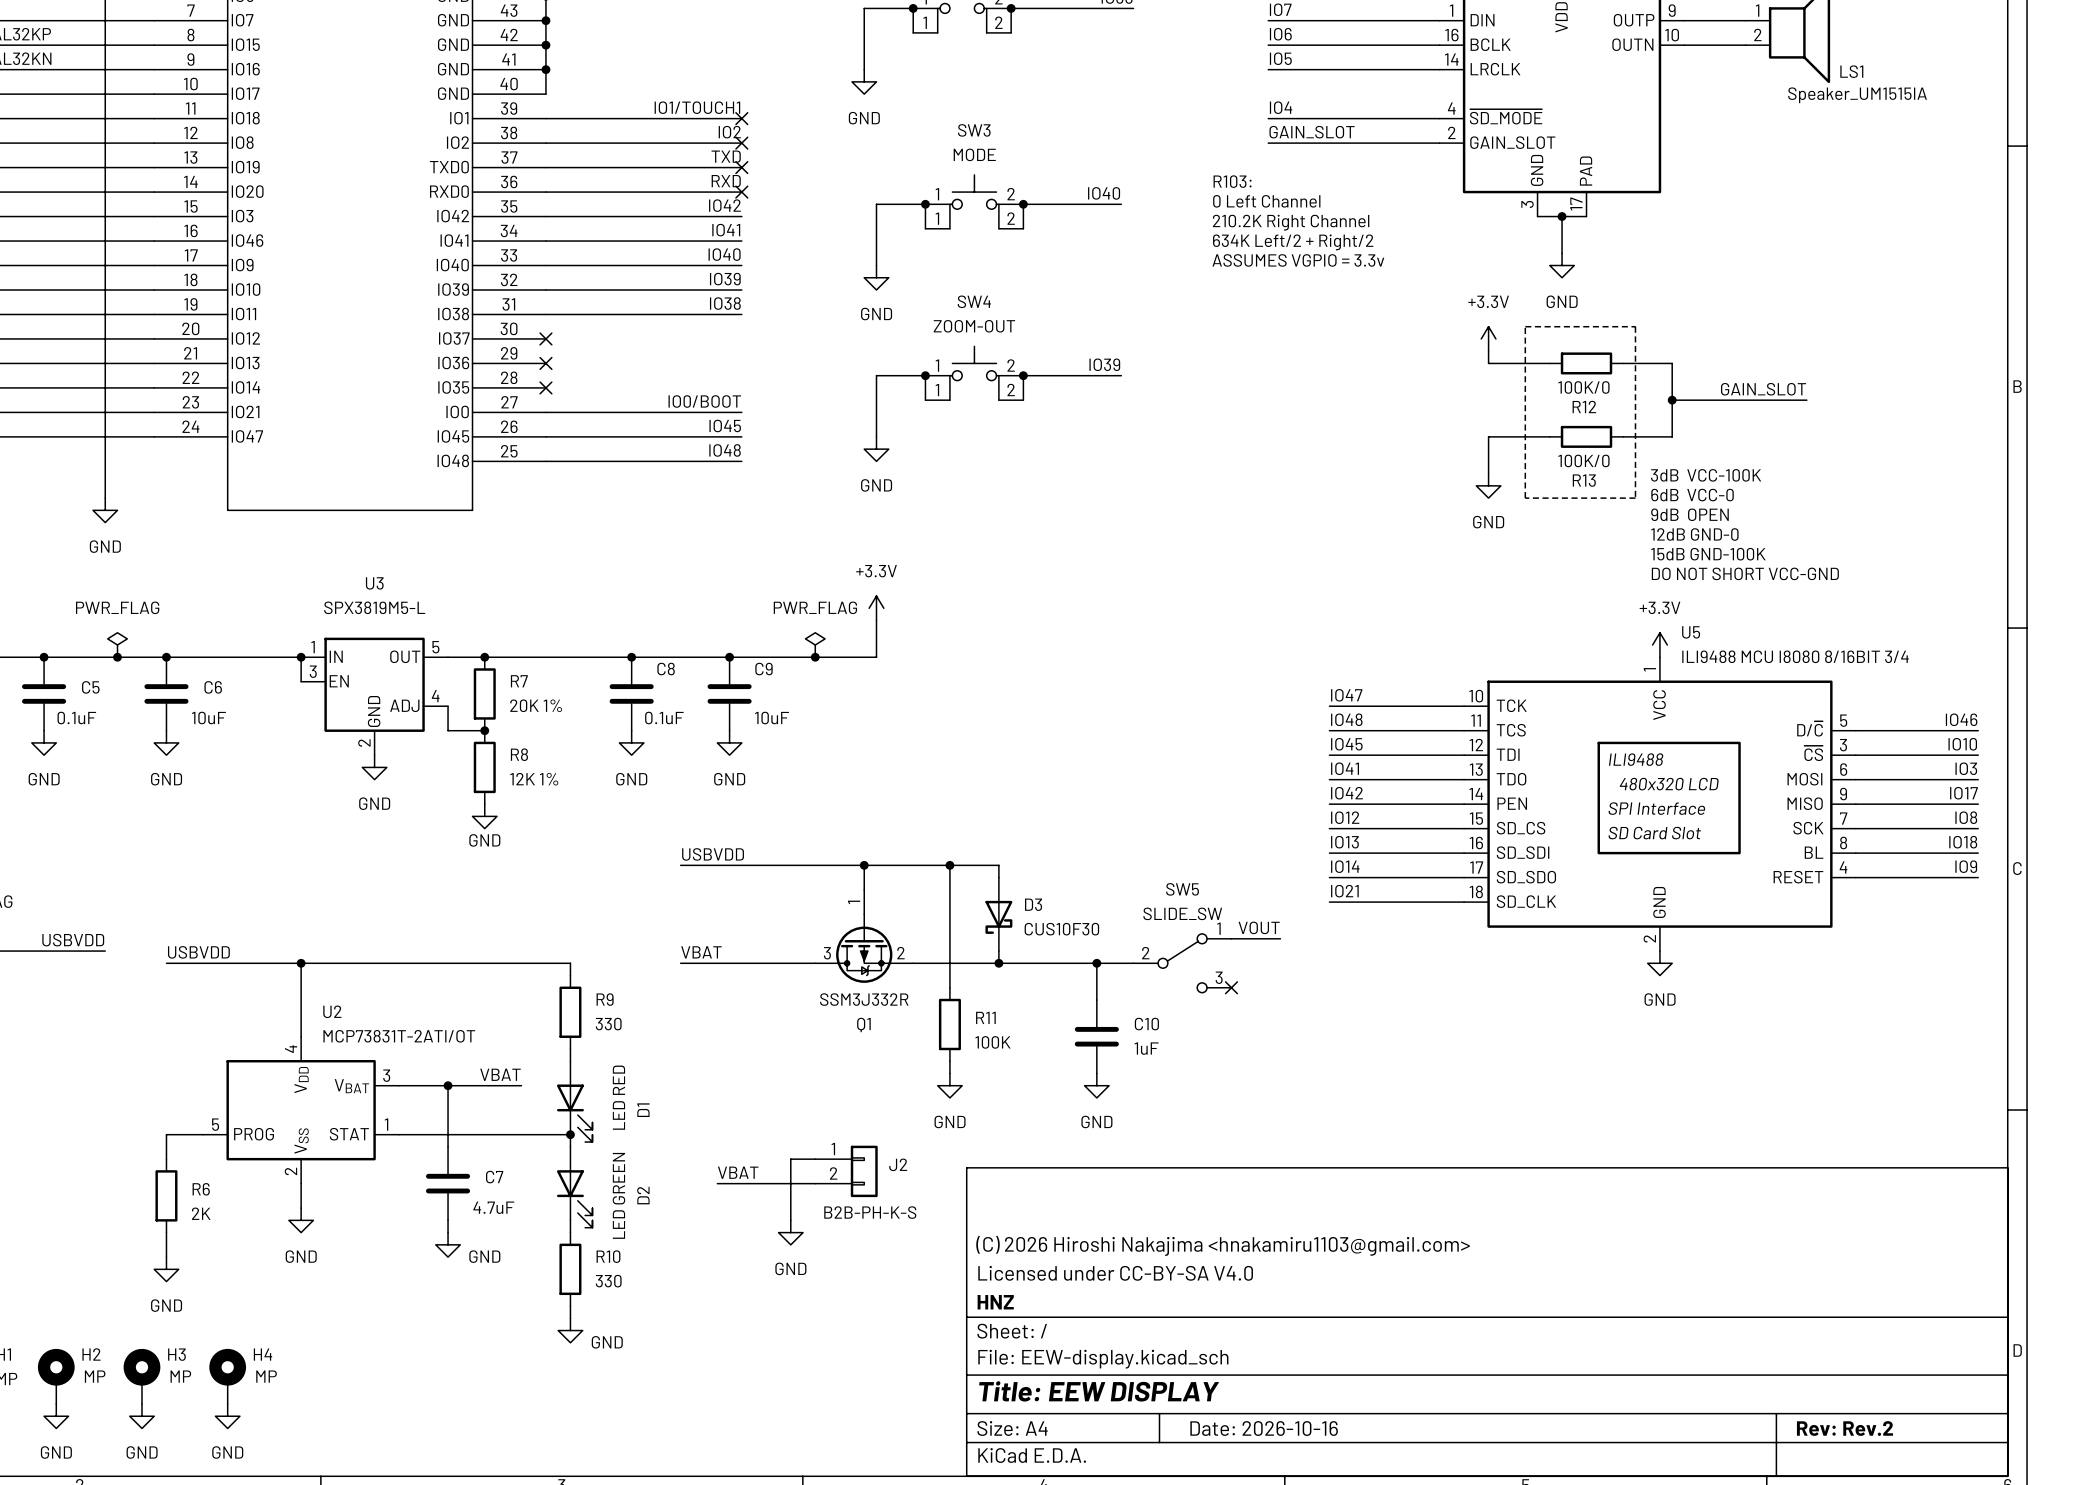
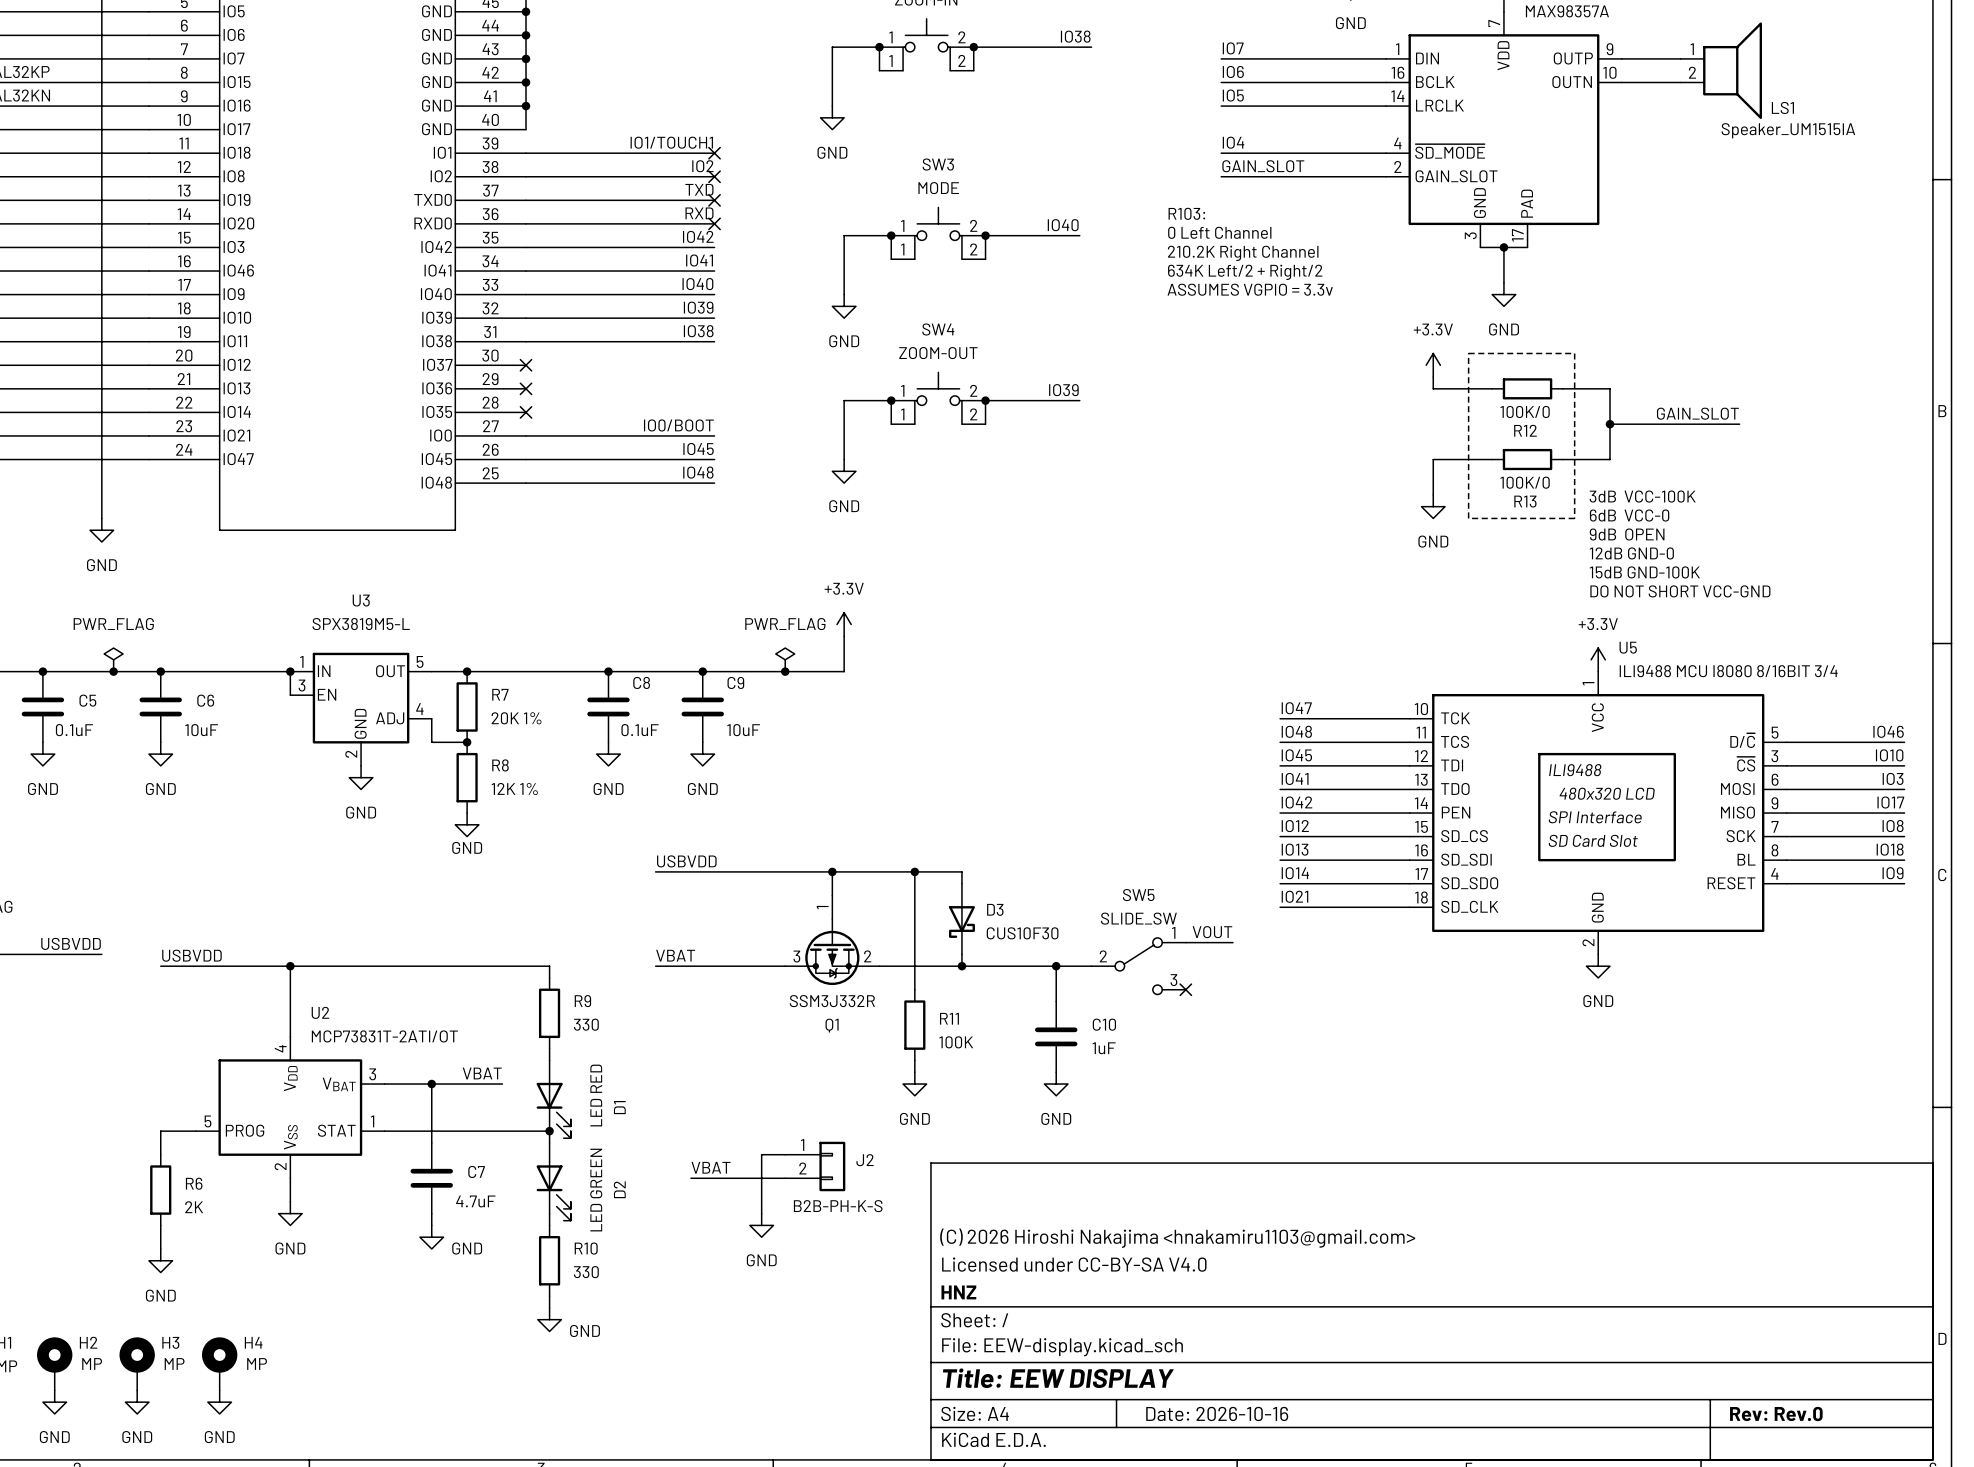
title block: Rev: Rev.2 (1844, 1428) -> Rev: Rev.0 (1776, 1413)

